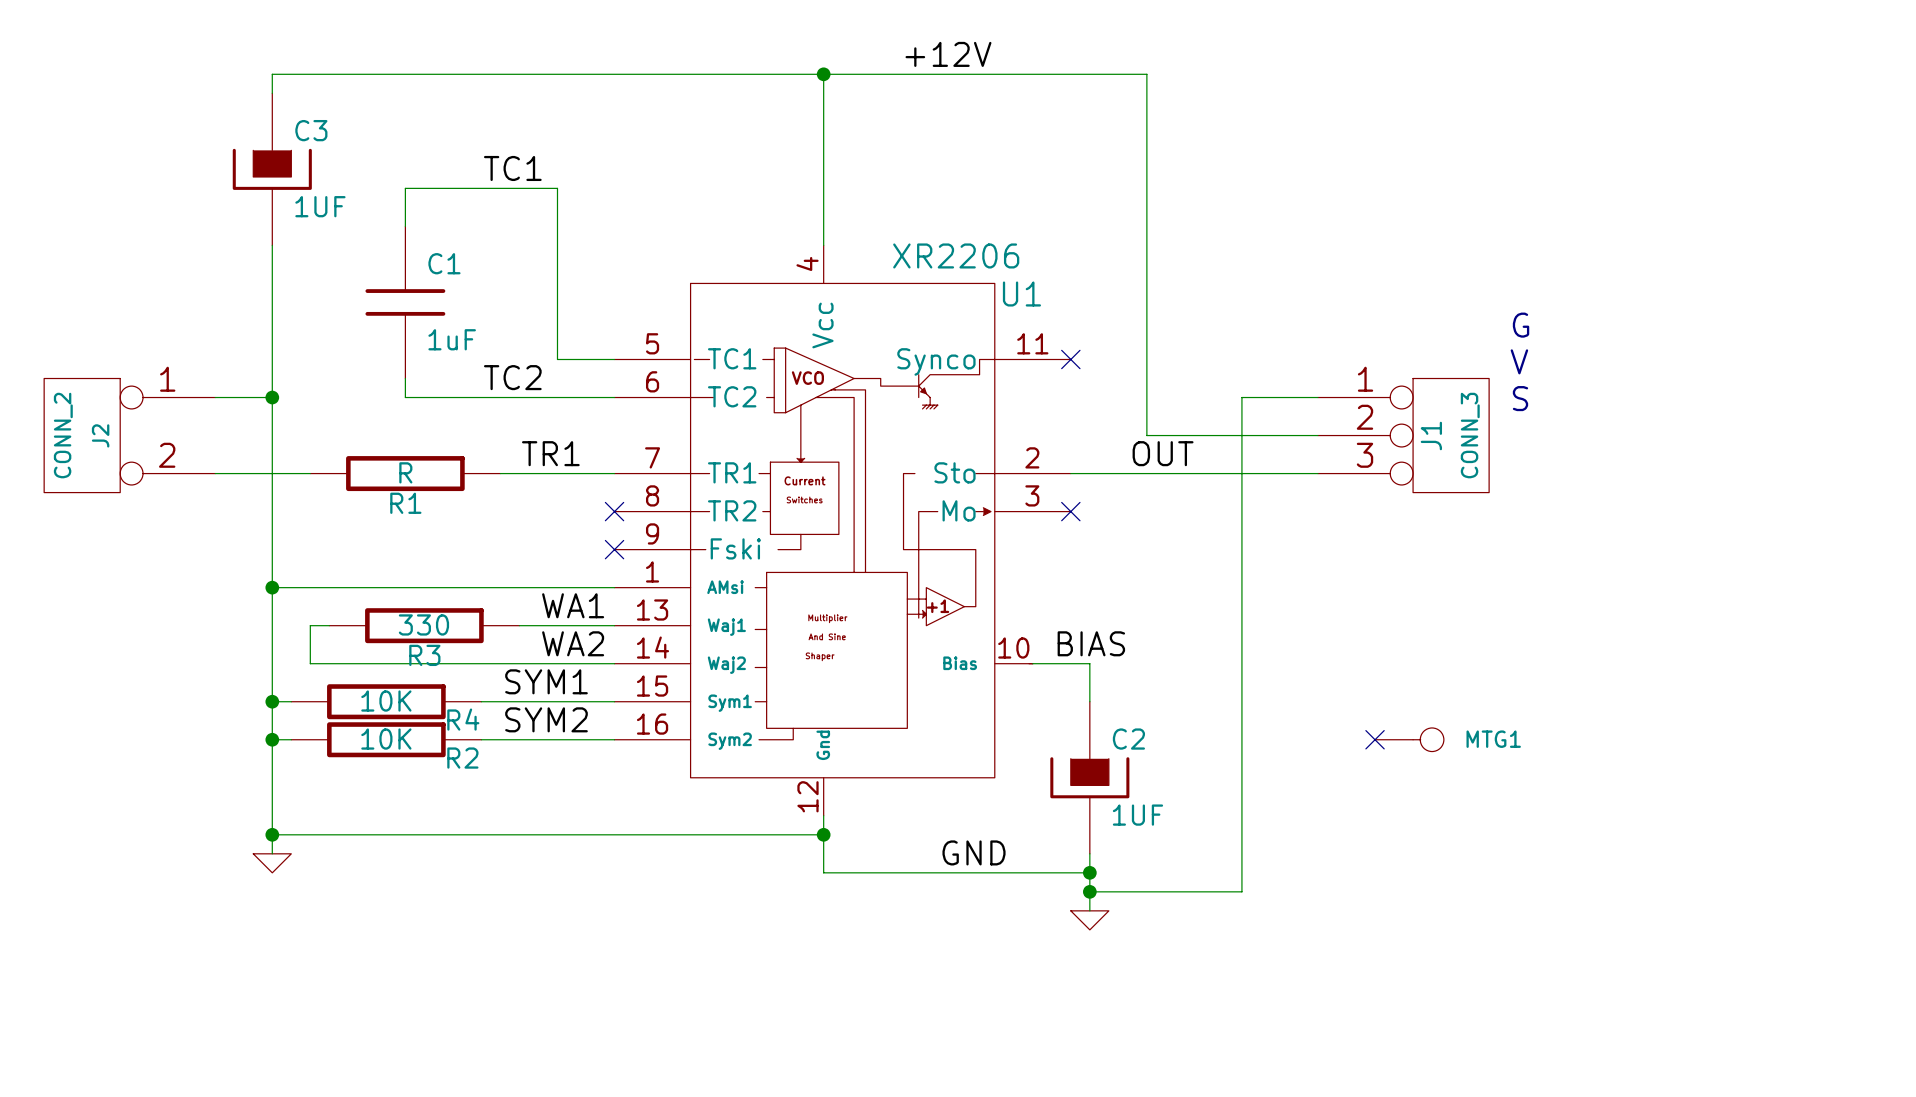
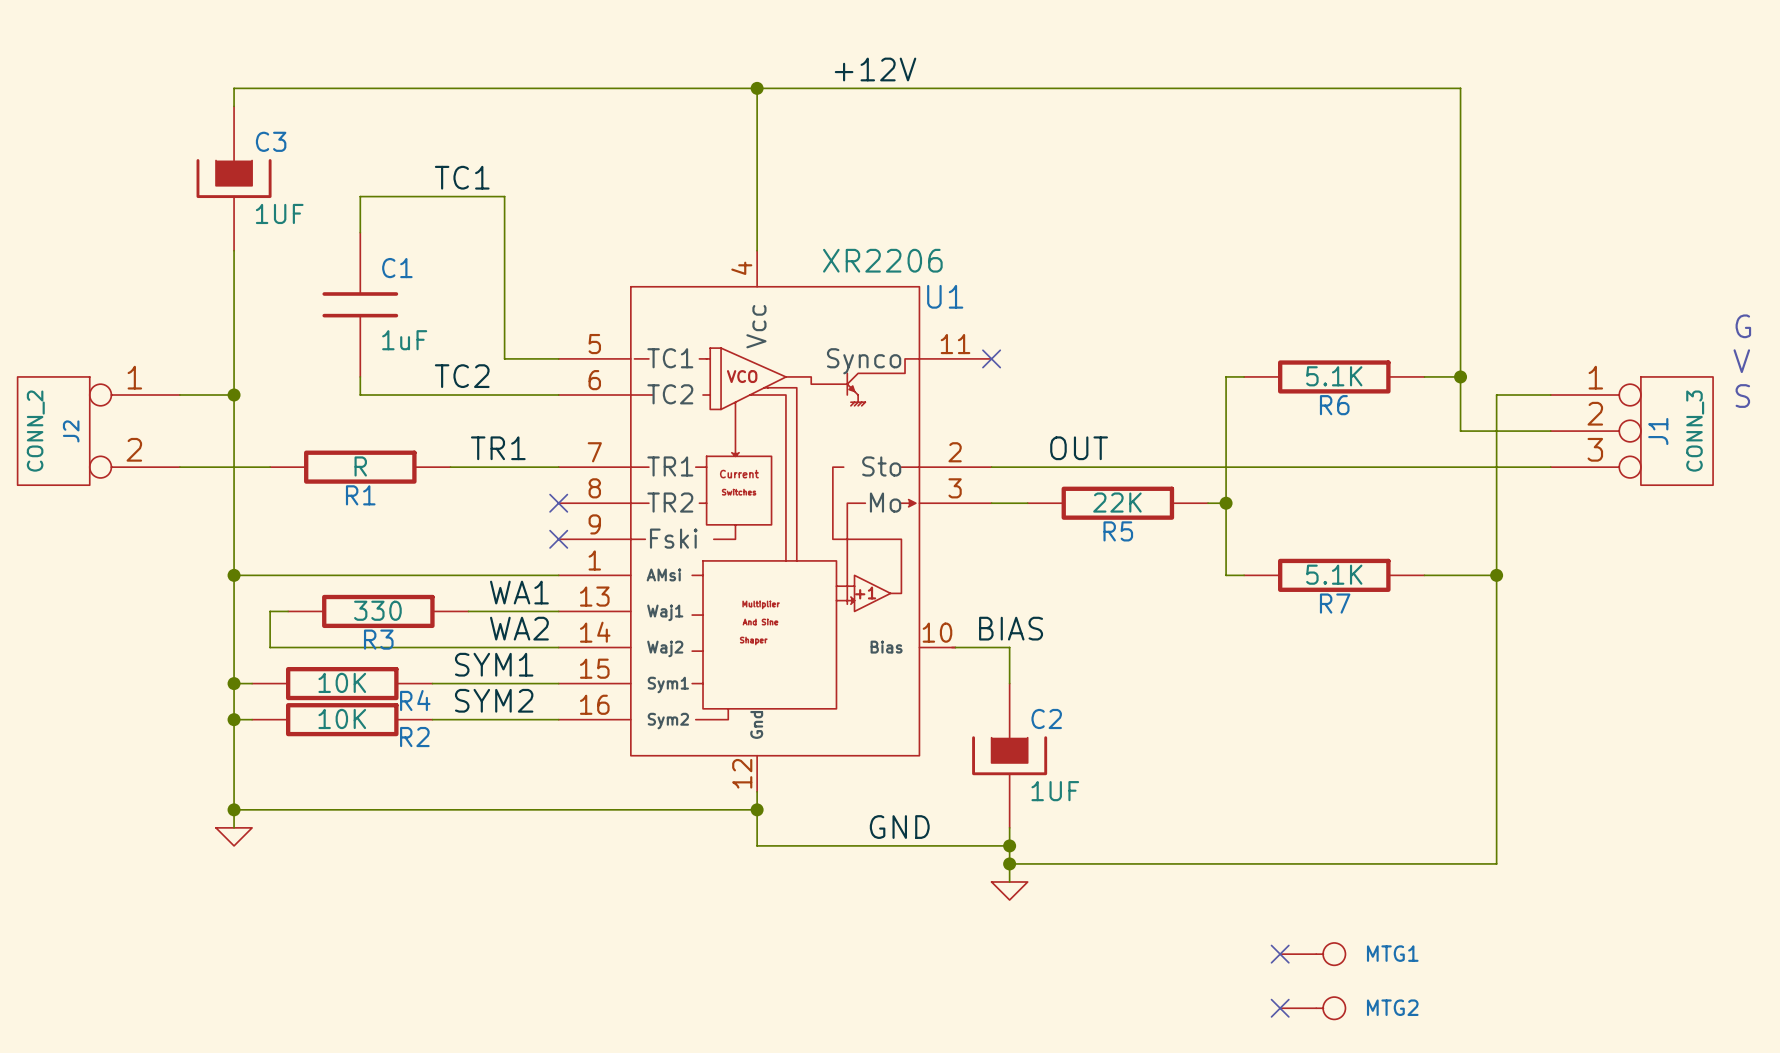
wire: (1146, 74) (1146, 435) (1318, 435) -> (1063, 88) (1460, 88) (1460, 431) (1550, 431)
text position: G (1521, 325) -> G (1743, 326)
text position: V (1519, 361) -> V (1741, 361)
wire: none -> (1244, 376) (1226, 376) (1226, 575) (1244, 575)
R6: none -> 5.1K (1334, 376)
wire: none -> (1424, 376) (1460, 376)
junction: none -> (1460, 376)
wire: (1318, 397) (1241, 397) (1241, 891) -> (1550, 395) (1496, 395) (1496, 863) (1153, 863)
text position: S (1520, 398) -> S (1742, 396)
J1 position: (1403, 435) -> (1631, 431)
wire: none -> (1226, 467) (1550, 467)
wire: none -> (991, 503) (1027, 503)
no-connect mark: (1070, 511) -> none
R5: none -> 22K (1117, 503)
wire: none -> (1208, 503) (1226, 503)
junction: none -> (1226, 503)
R7: none -> 5.1K (1334, 575)
wire: none -> (1424, 575) (1496, 575)
junction: none -> (1496, 575)
no-connect mark: (1375, 739) -> none
MTG1 position: (1409, 739) -> (1312, 954)
no-connect mark: none -> (1280, 954)
no-connect mark: none -> (1280, 1008)
MTG2: none -> (1312, 1008)

